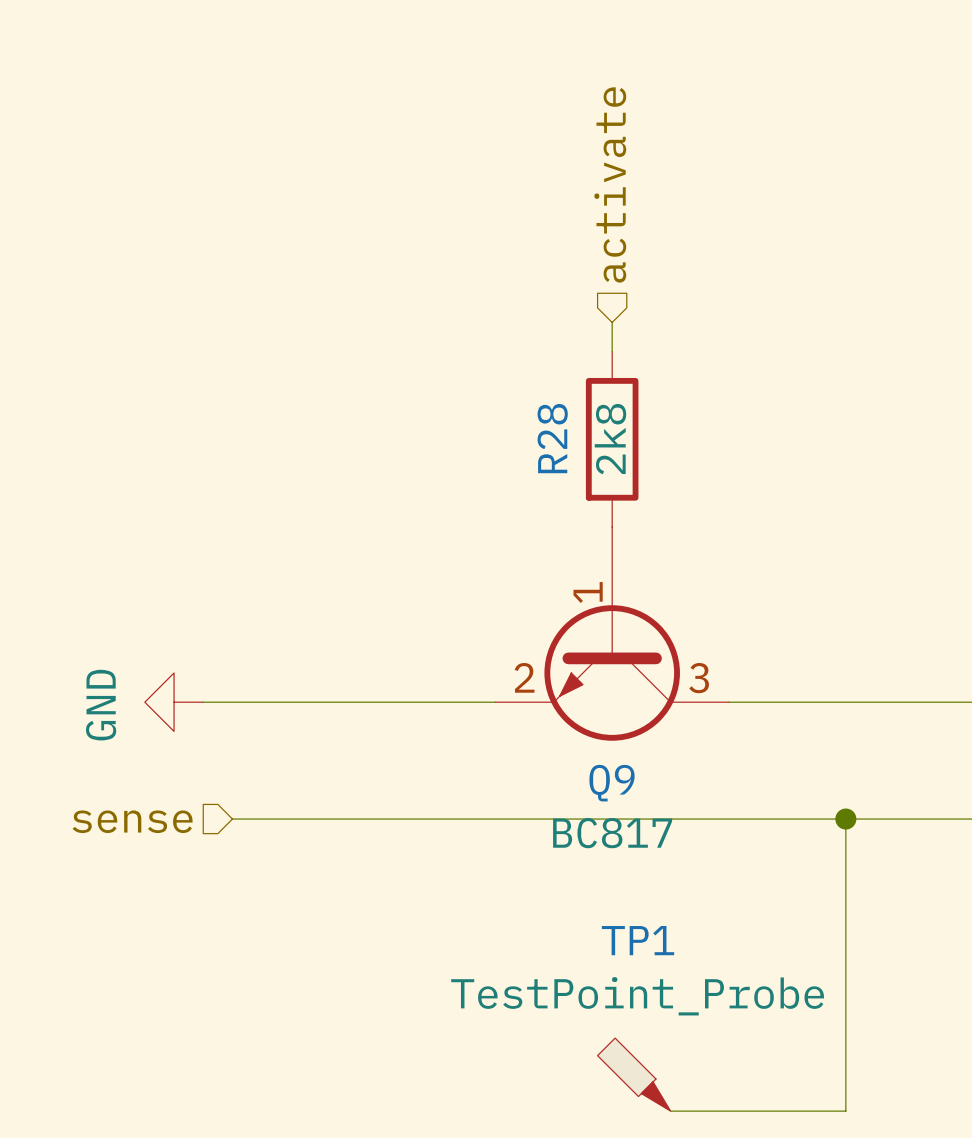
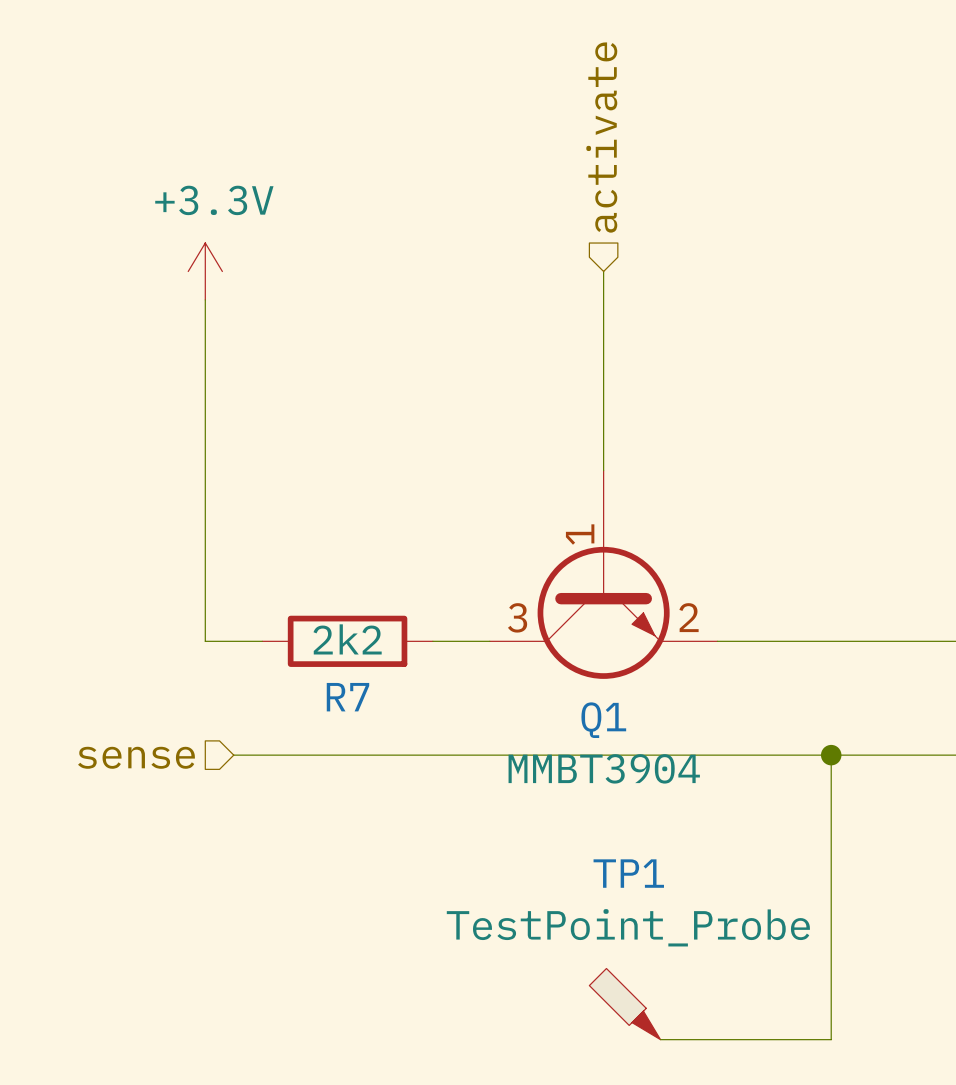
power symbol: none -> +3.3V (205, 271)
wire: none -> (205, 299) (205, 641)
wire: none -> (603, 299) (603, 470)
R28: 2k8 (612, 439) -> none
Q9: BC817 (612, 633) -> none
Q1: none -> MMBT3904 (603, 574)
power symbol: GND (174, 702) -> none
wire: (261, 702) (436, 702) -> none
R7: none -> 2k2 (347, 641)

